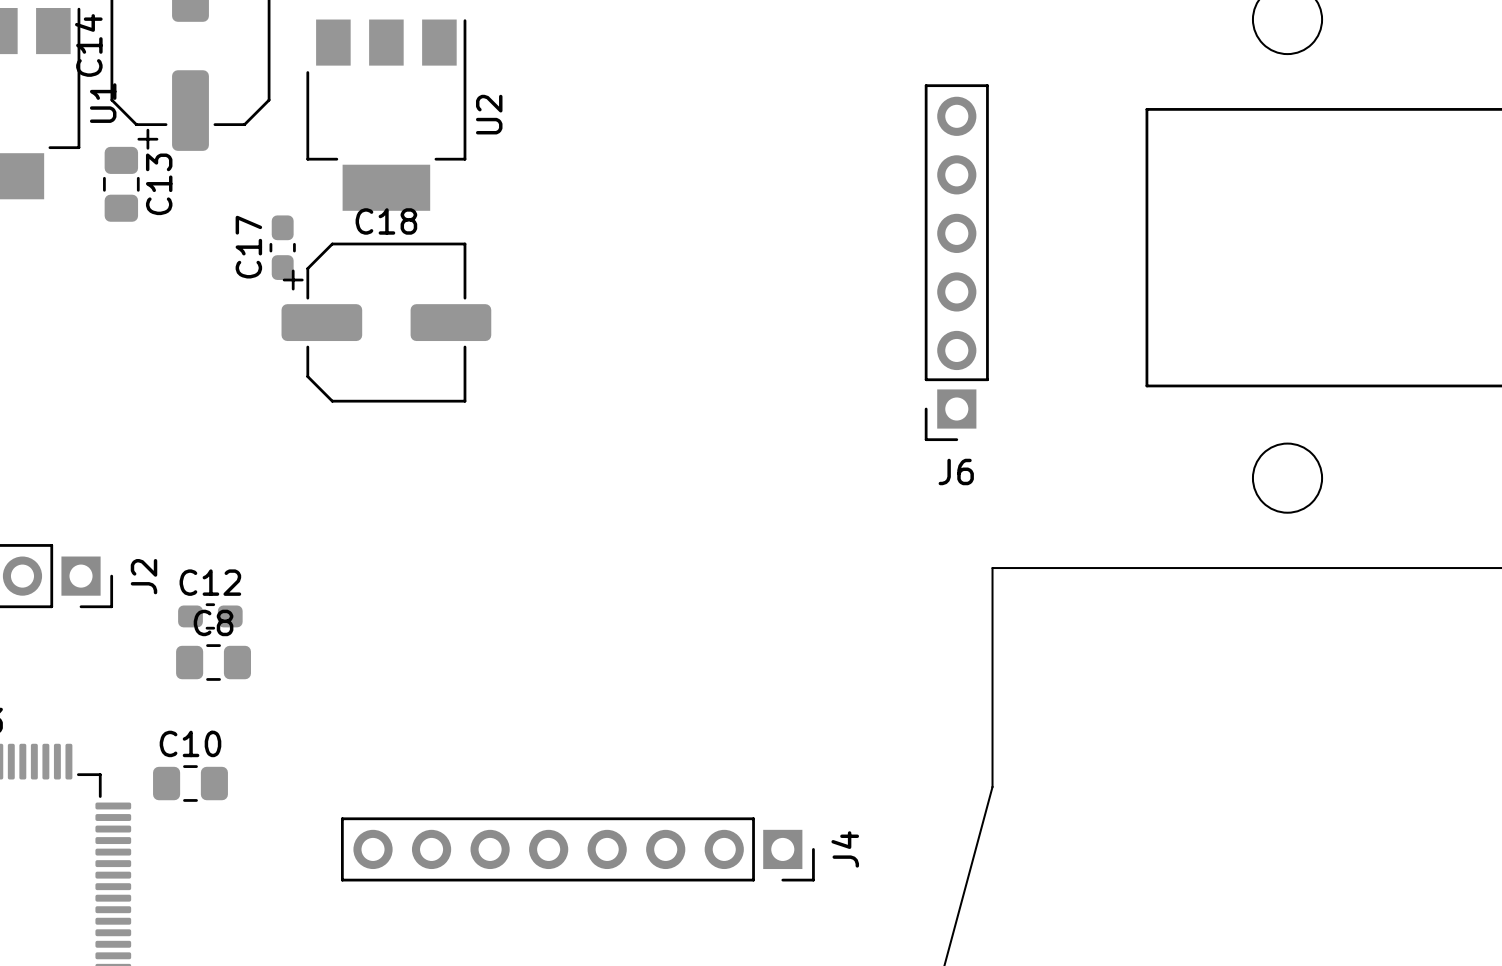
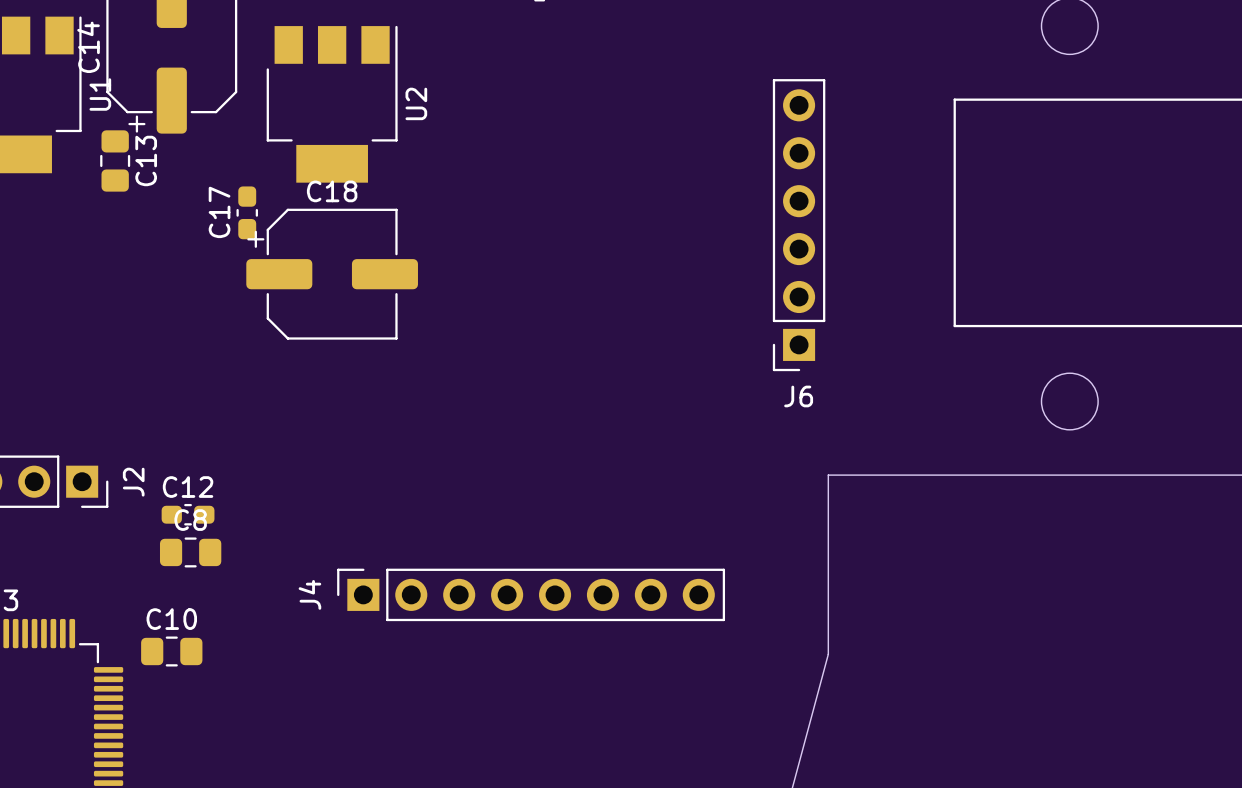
J4 rotation: 0° (577, 849) -> 180° (531, 594)

